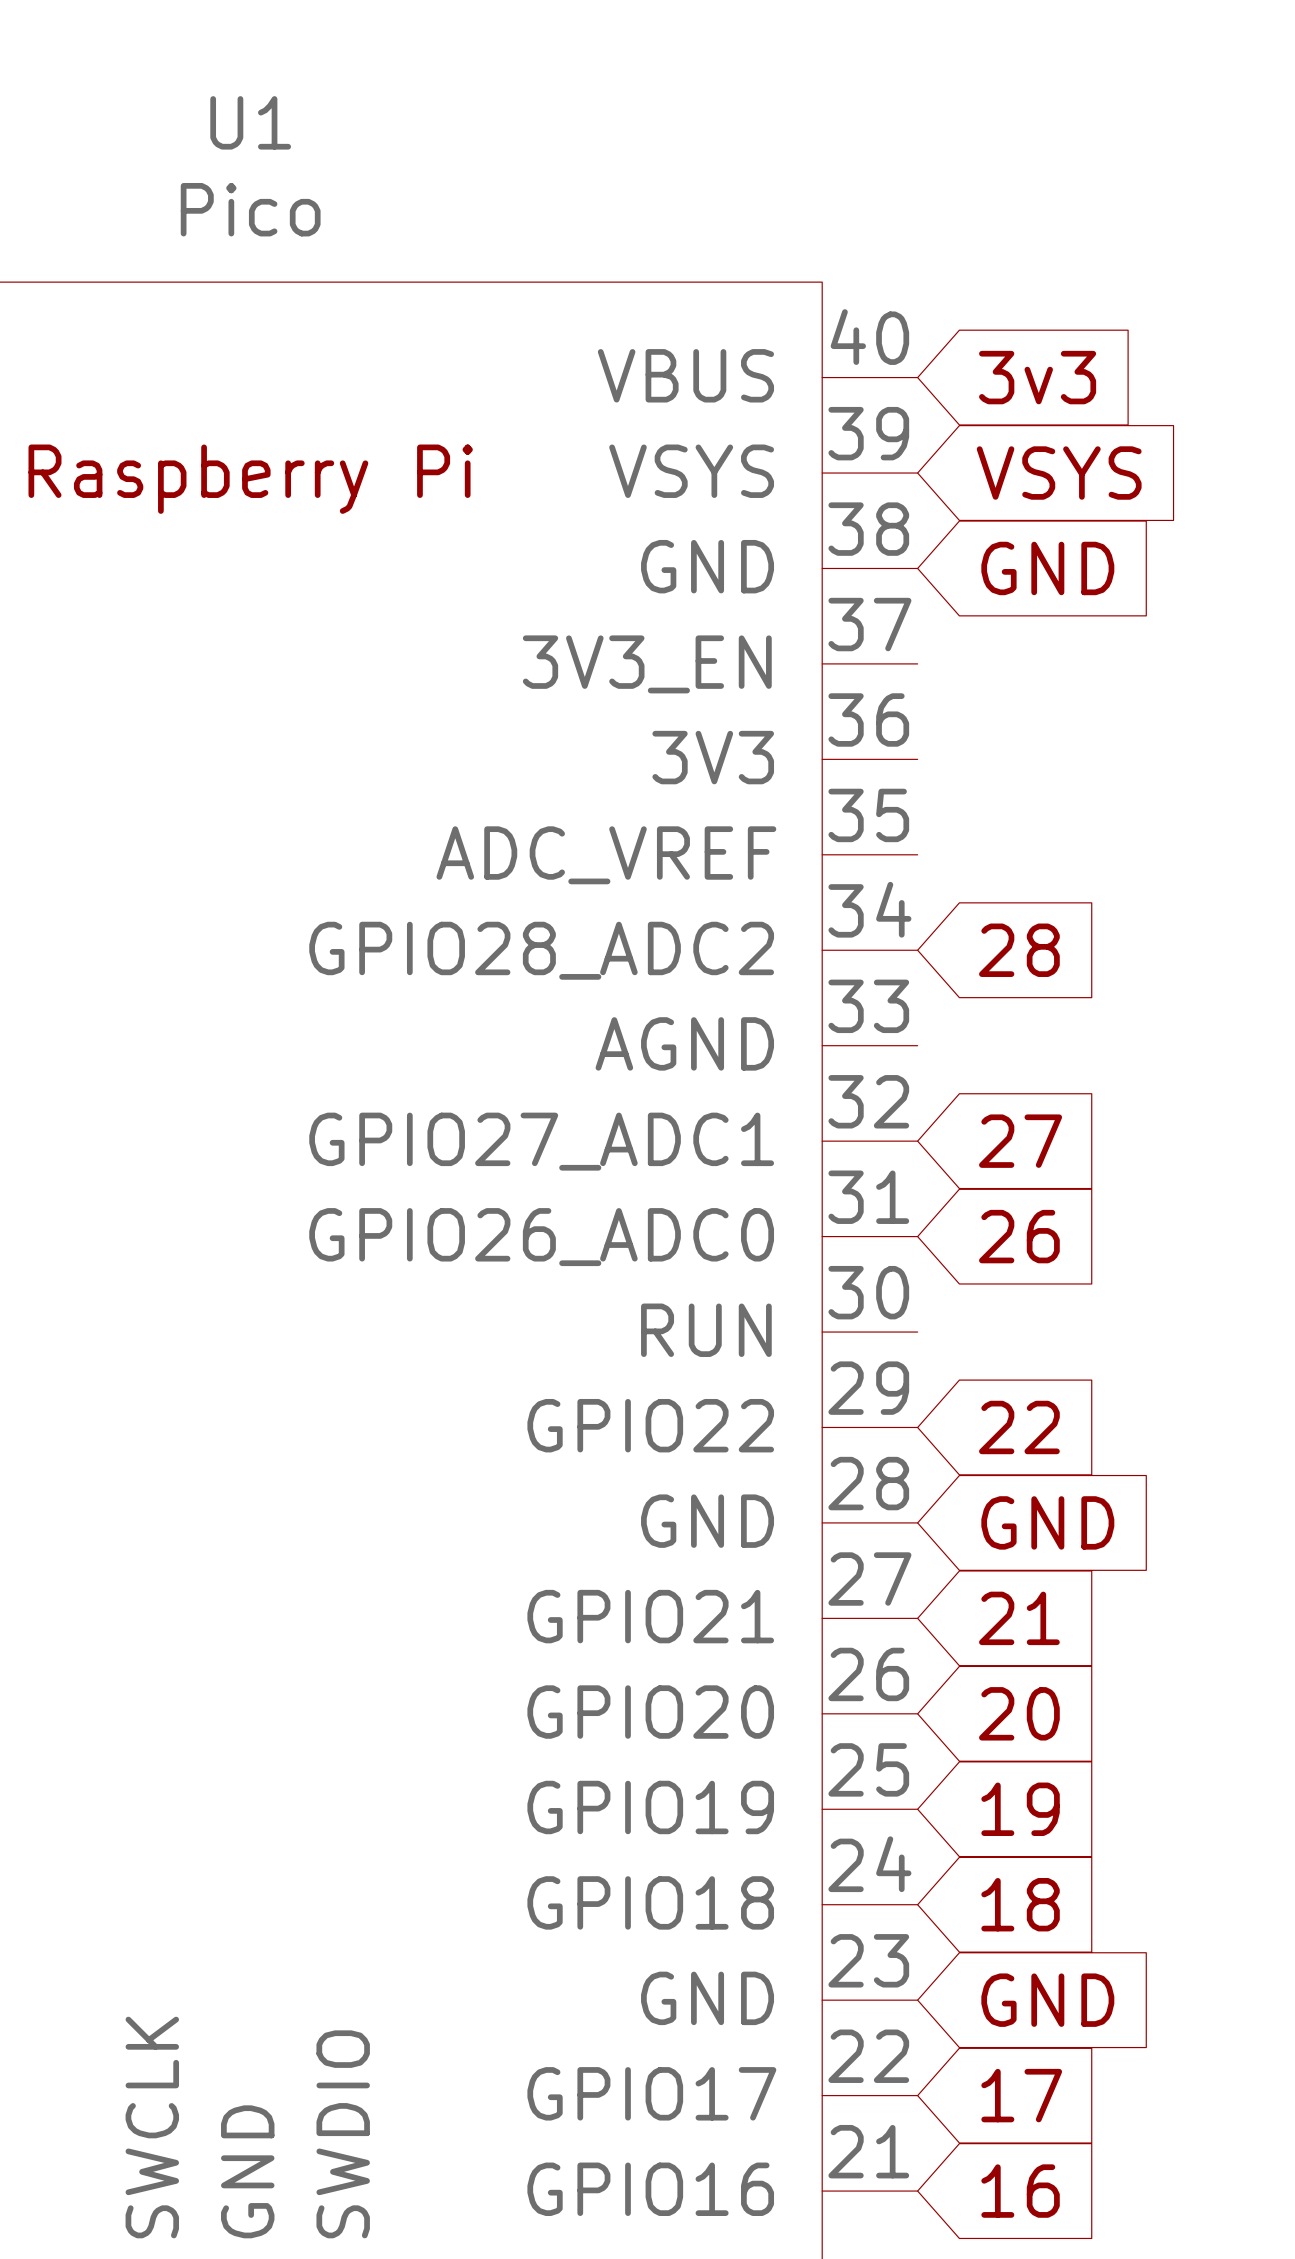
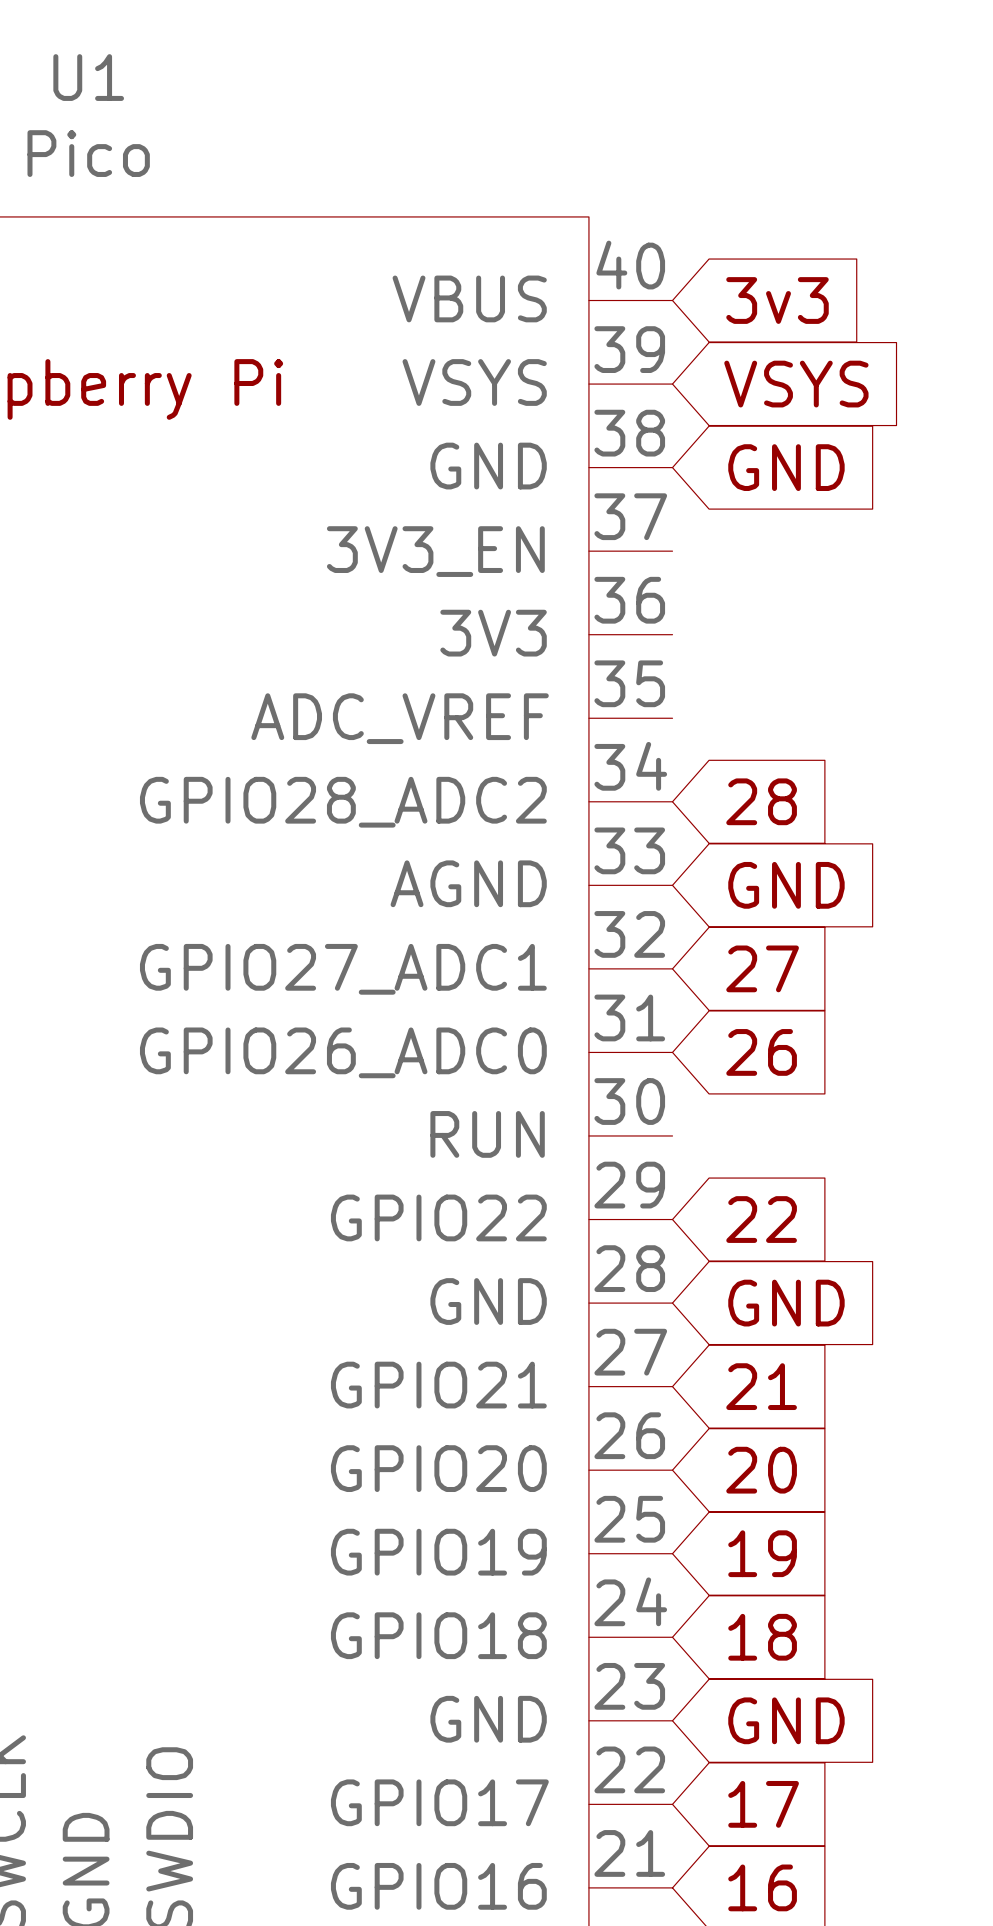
global label: none -> GND (786, 885)

